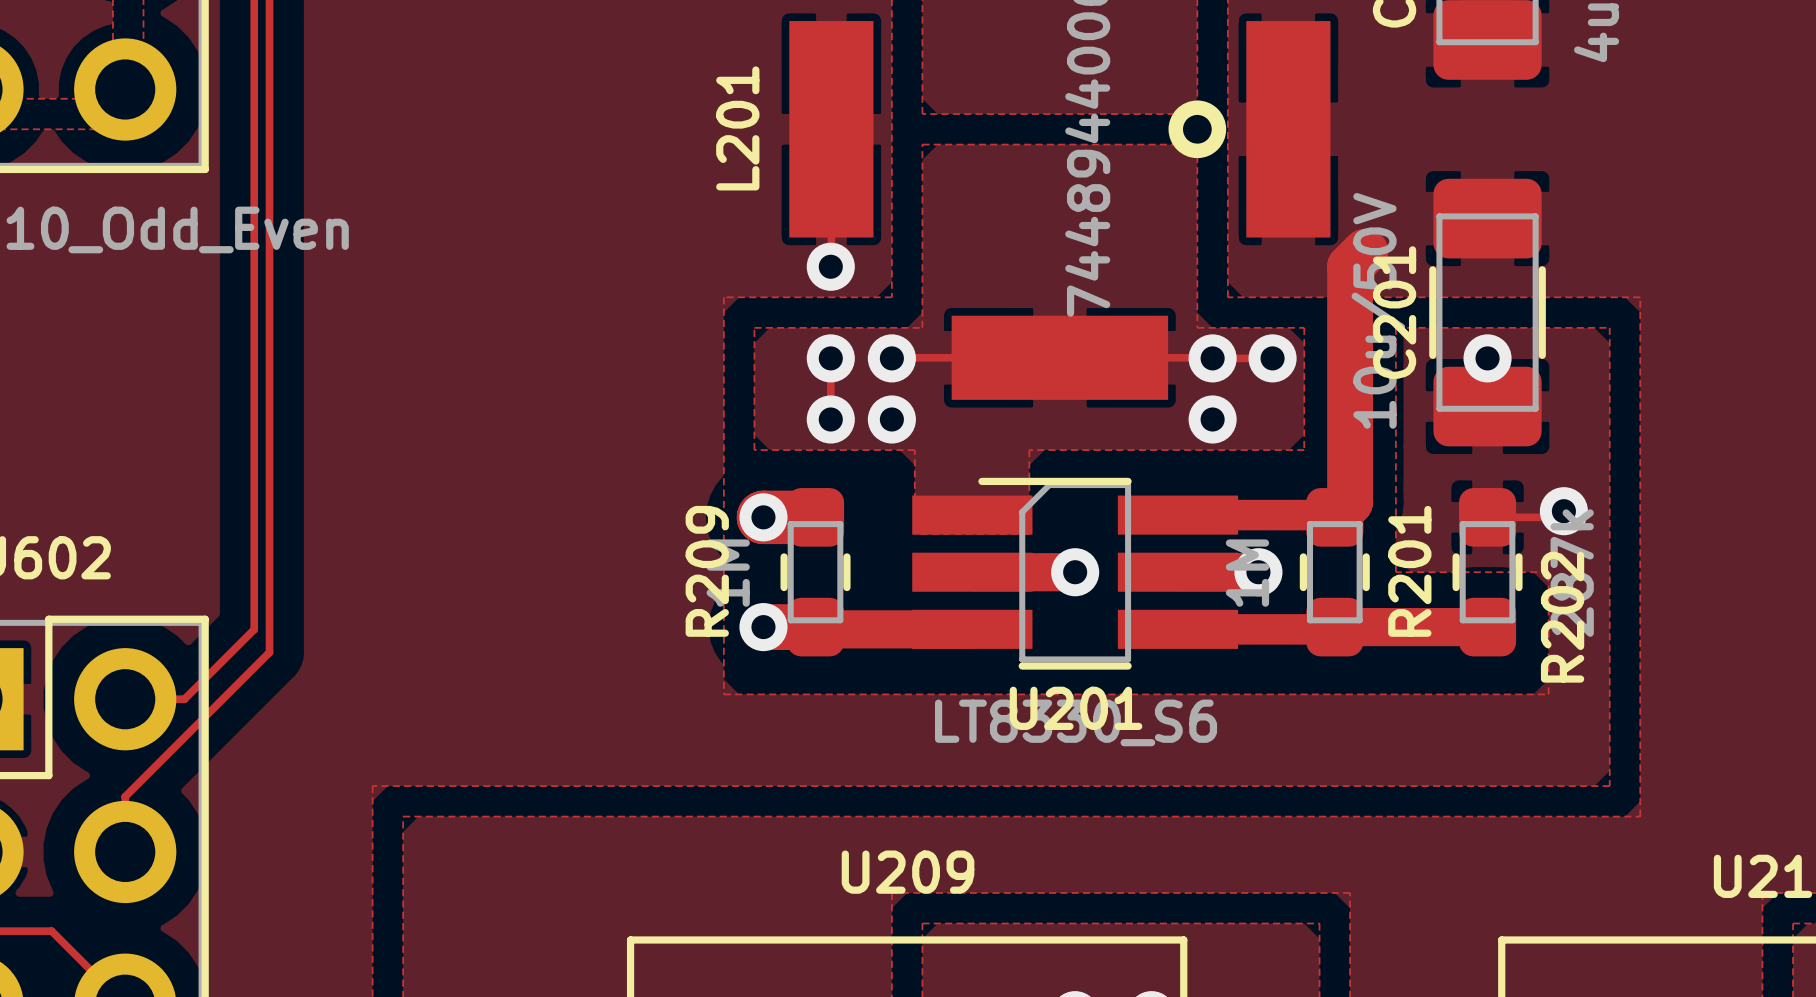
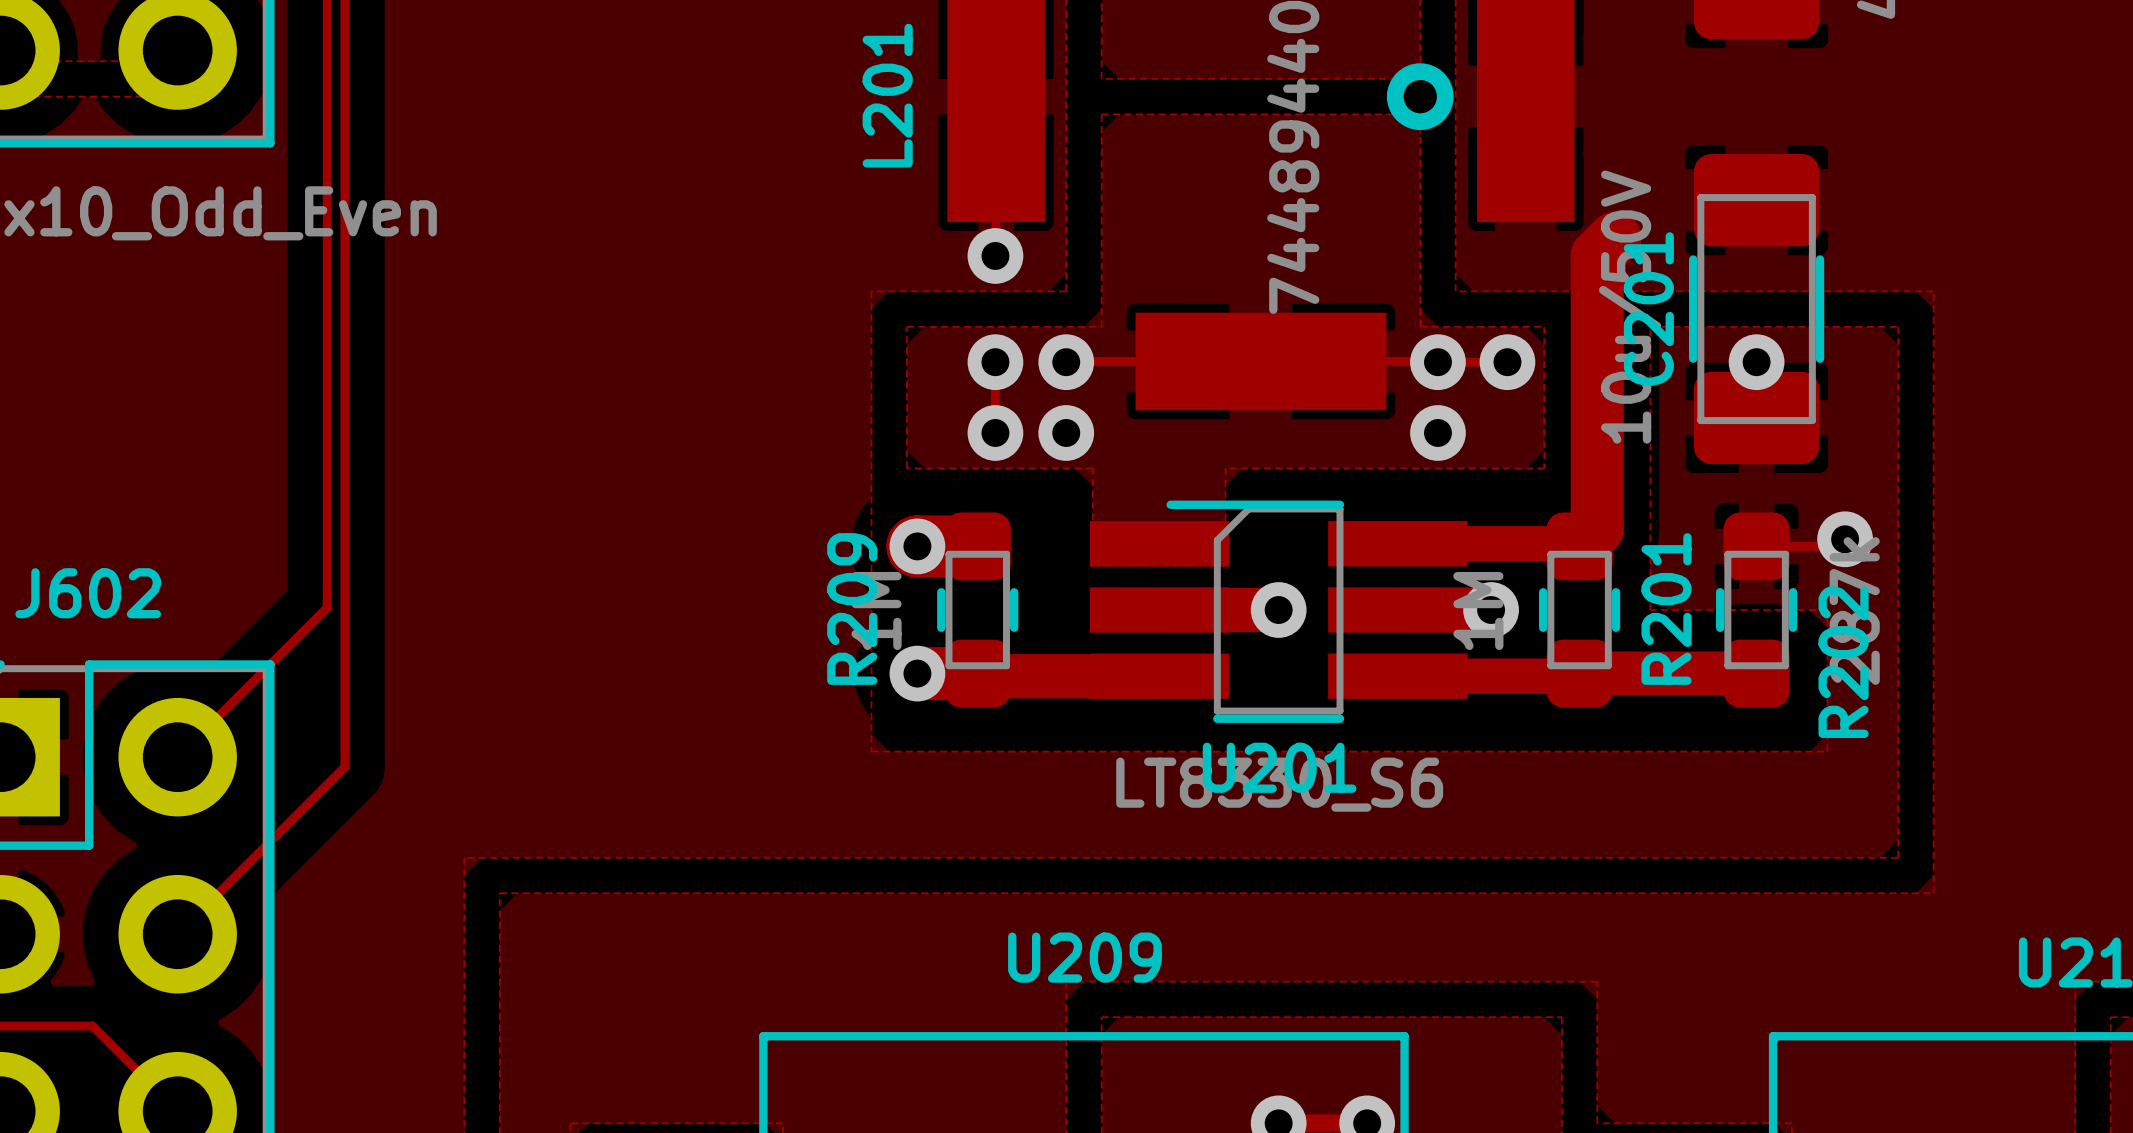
track: (254, 570) (254, 629) (184, 699) (125, 699) -> (327, 607) (177, 757)
track: (269, 652) (125, 796) (125, 851) -> (344, 702) (344, 766) (177, 934)

